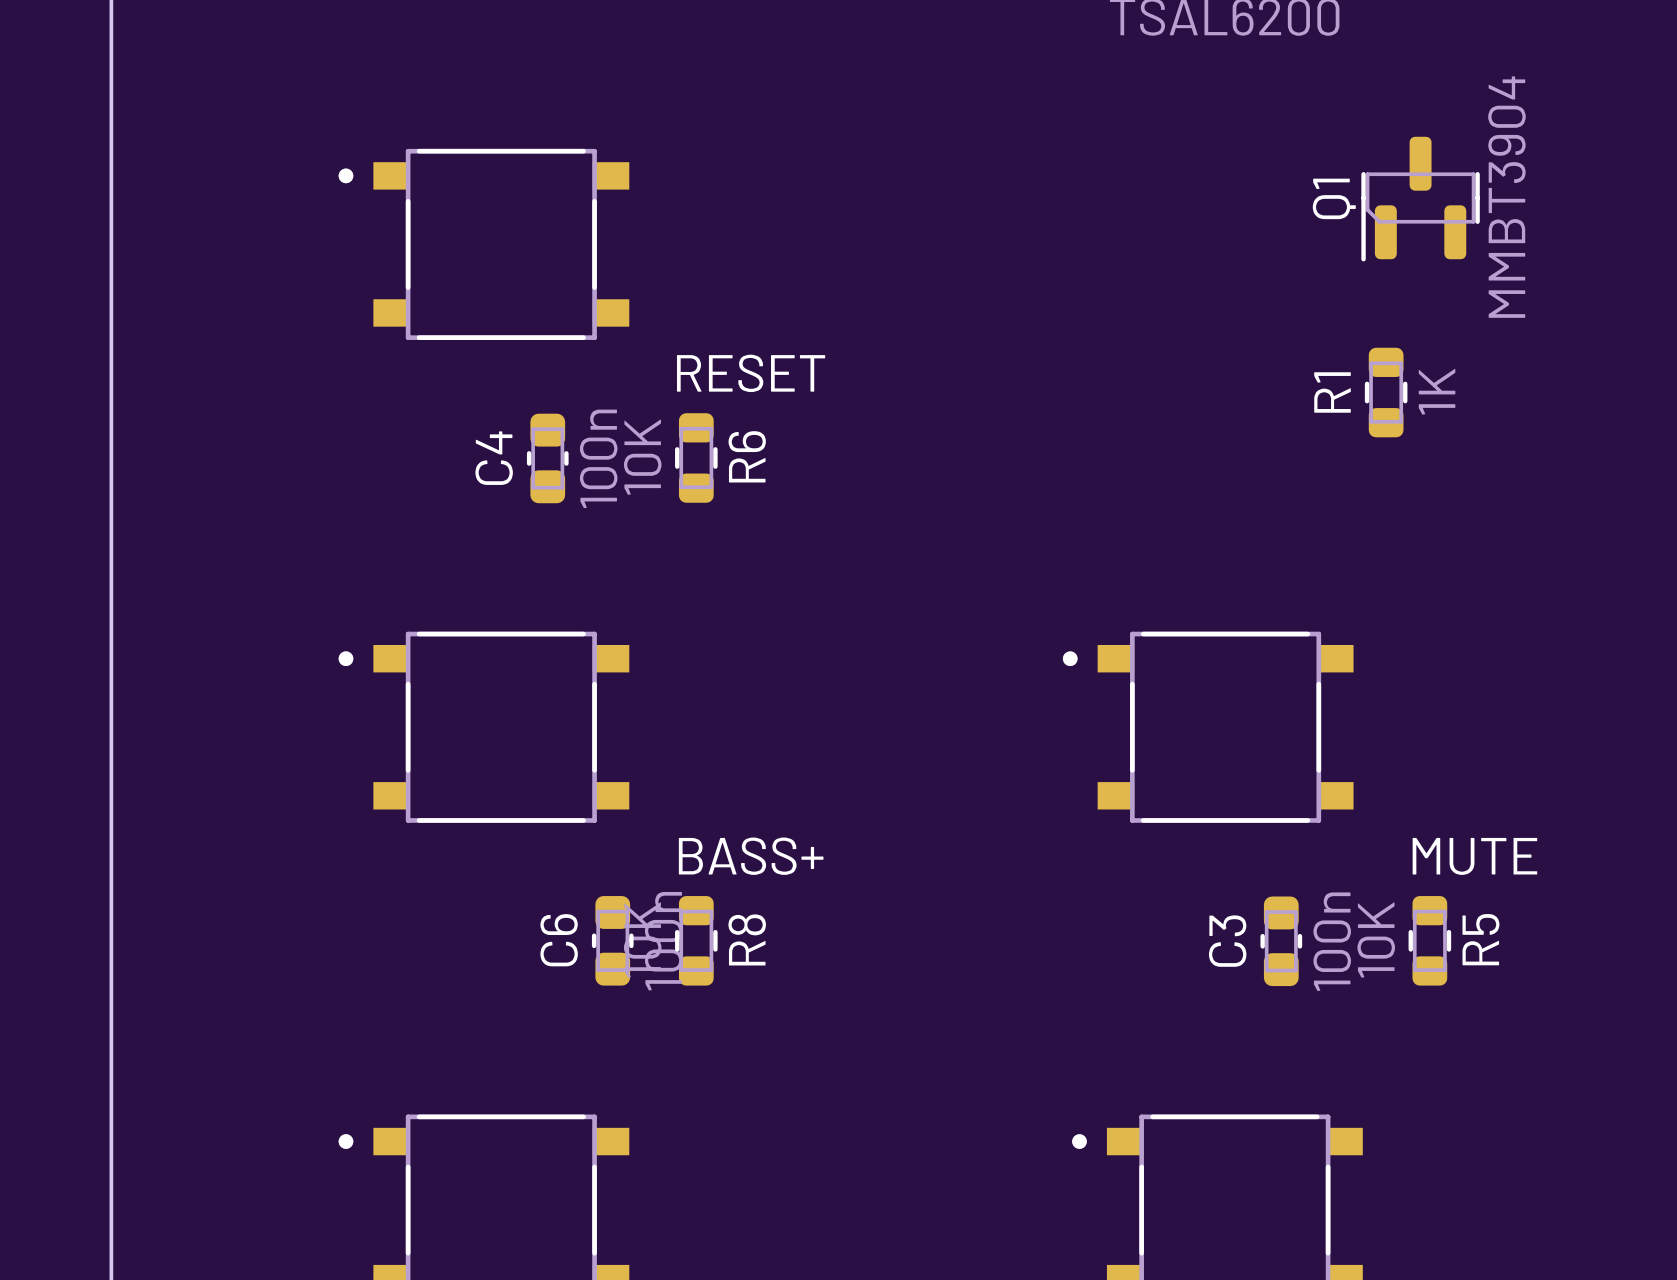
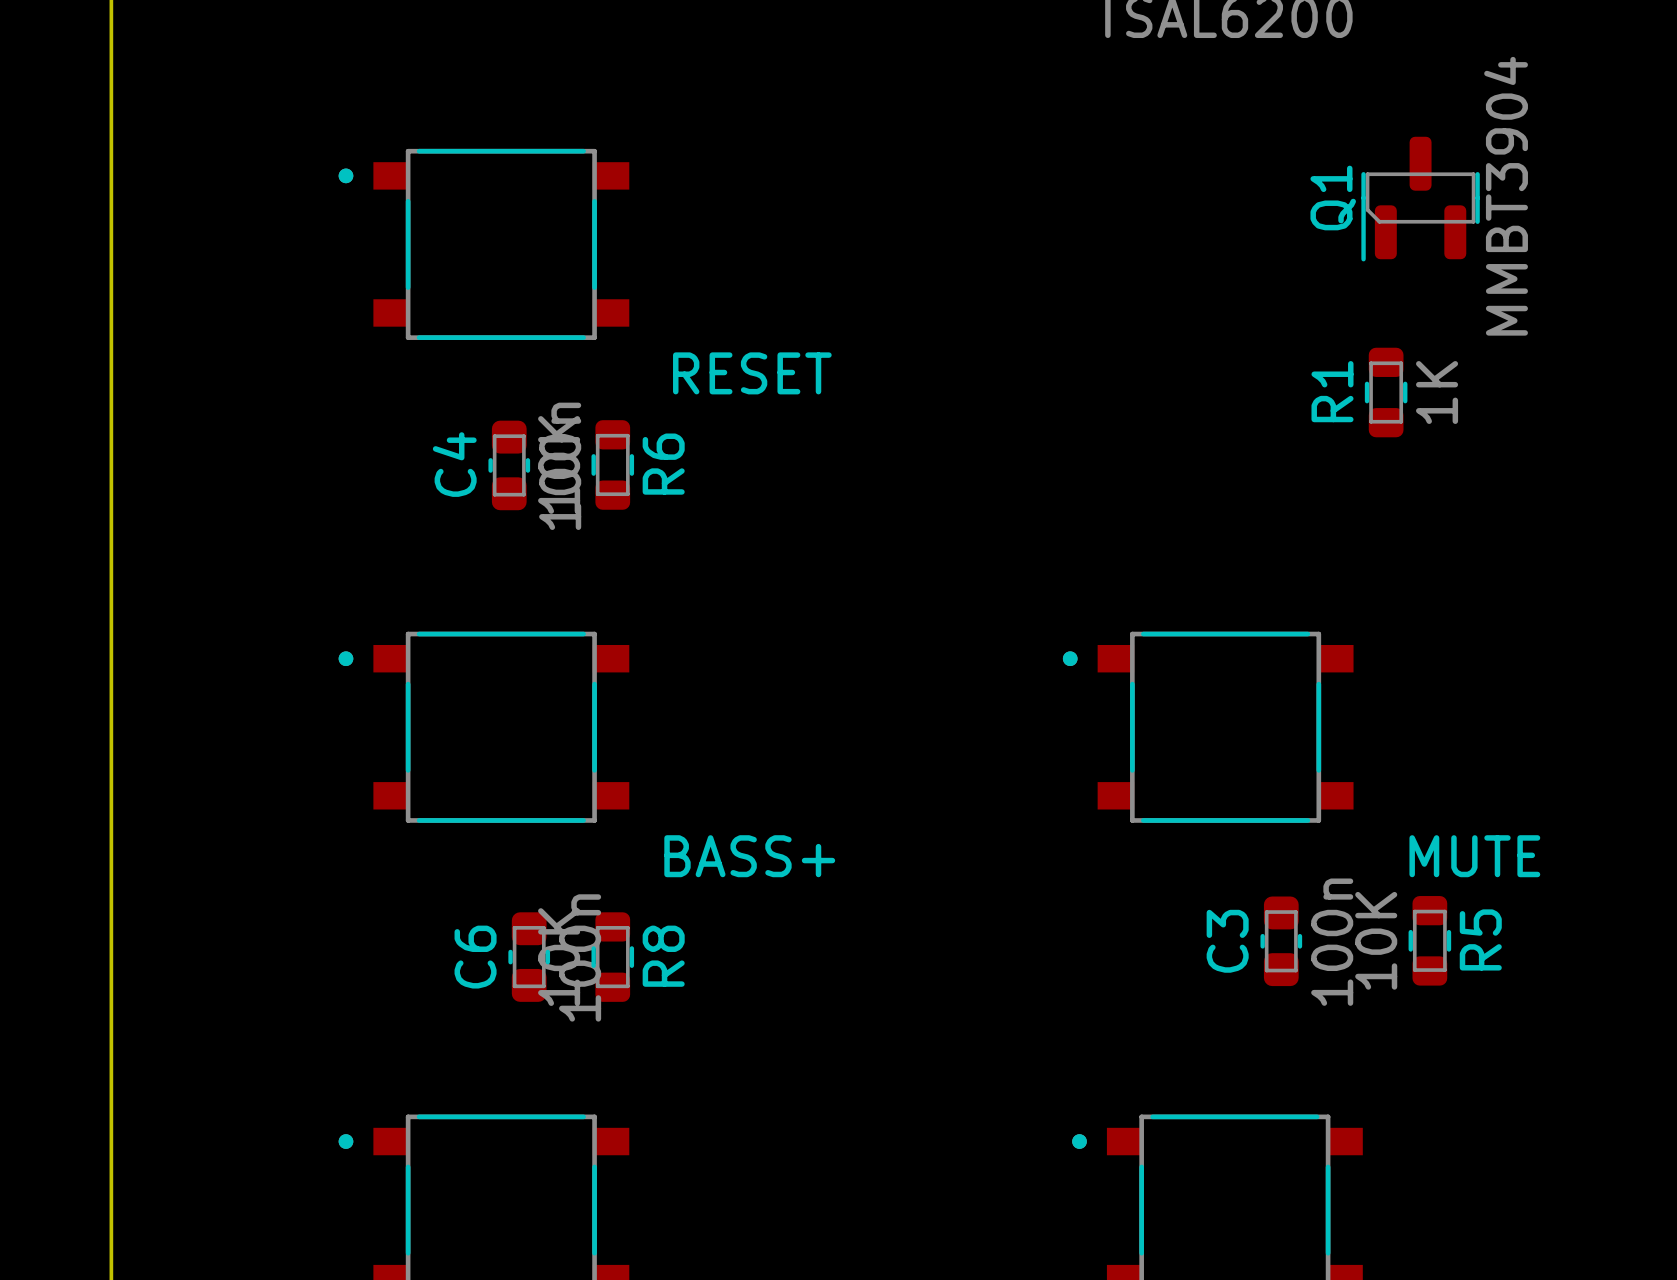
R6 position: (696, 457) -> (612, 464)
C4 position: (547, 458) -> (509, 465)
C6 position: (612, 940) -> (529, 957)
R8 position: (696, 940) -> (612, 957)

